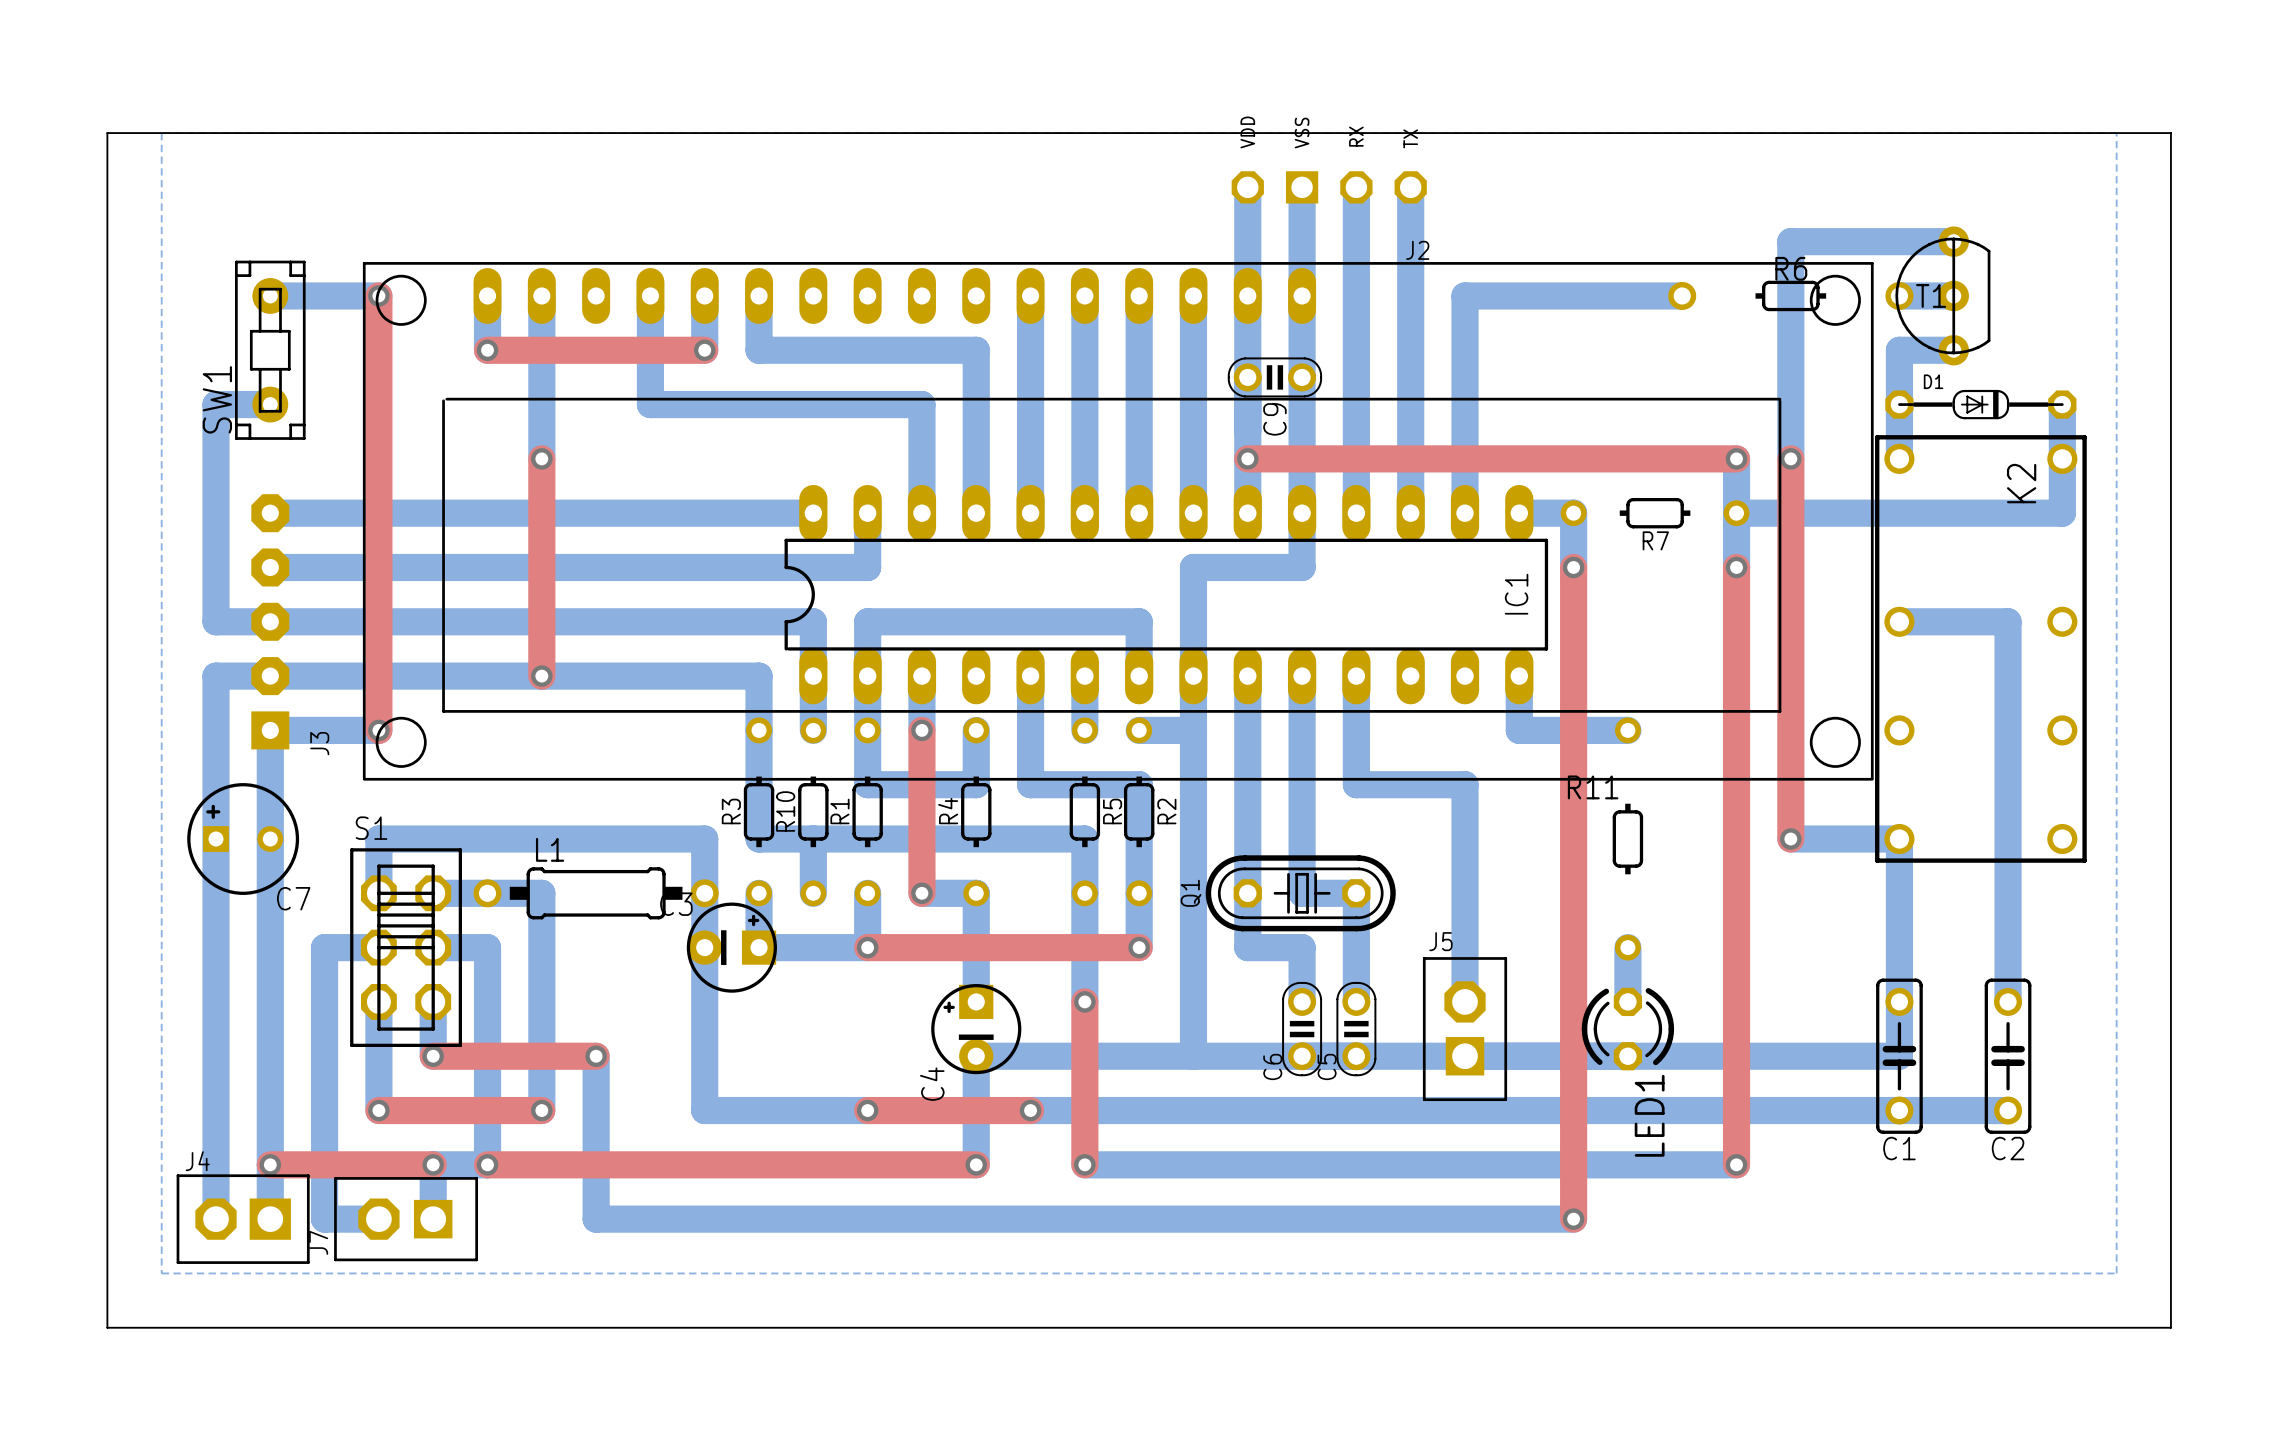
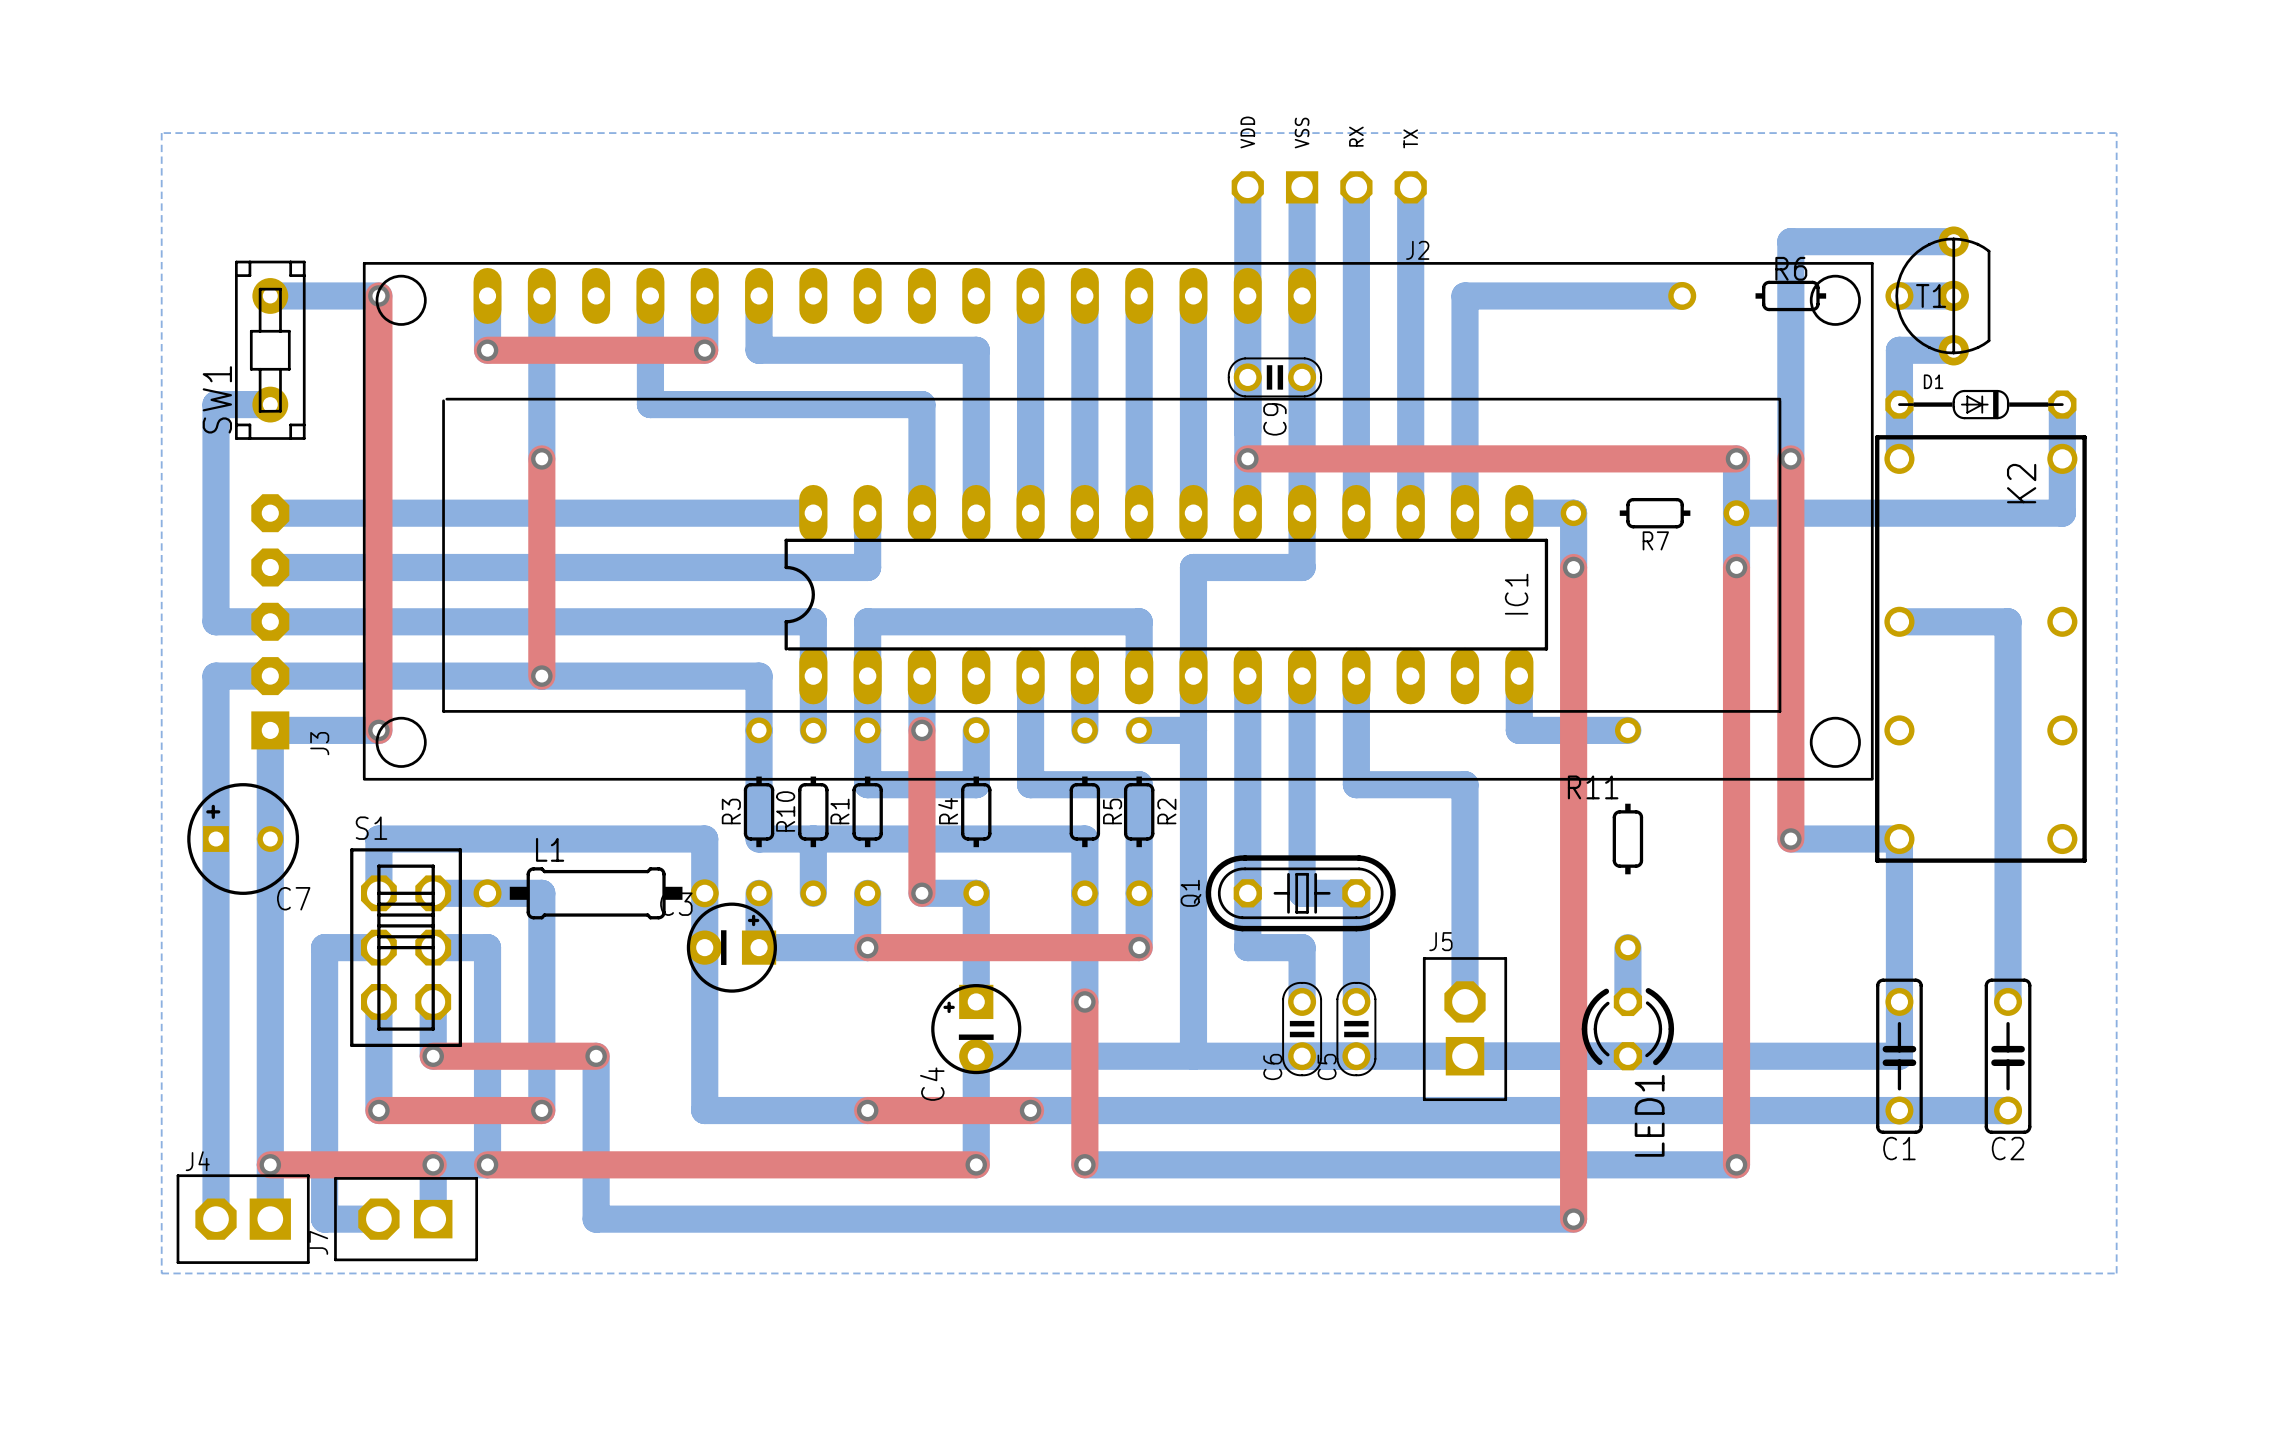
board edge: (107, 133) (107, 1327) (2170, 1327) (2170, 133) (107, 133) -> none

